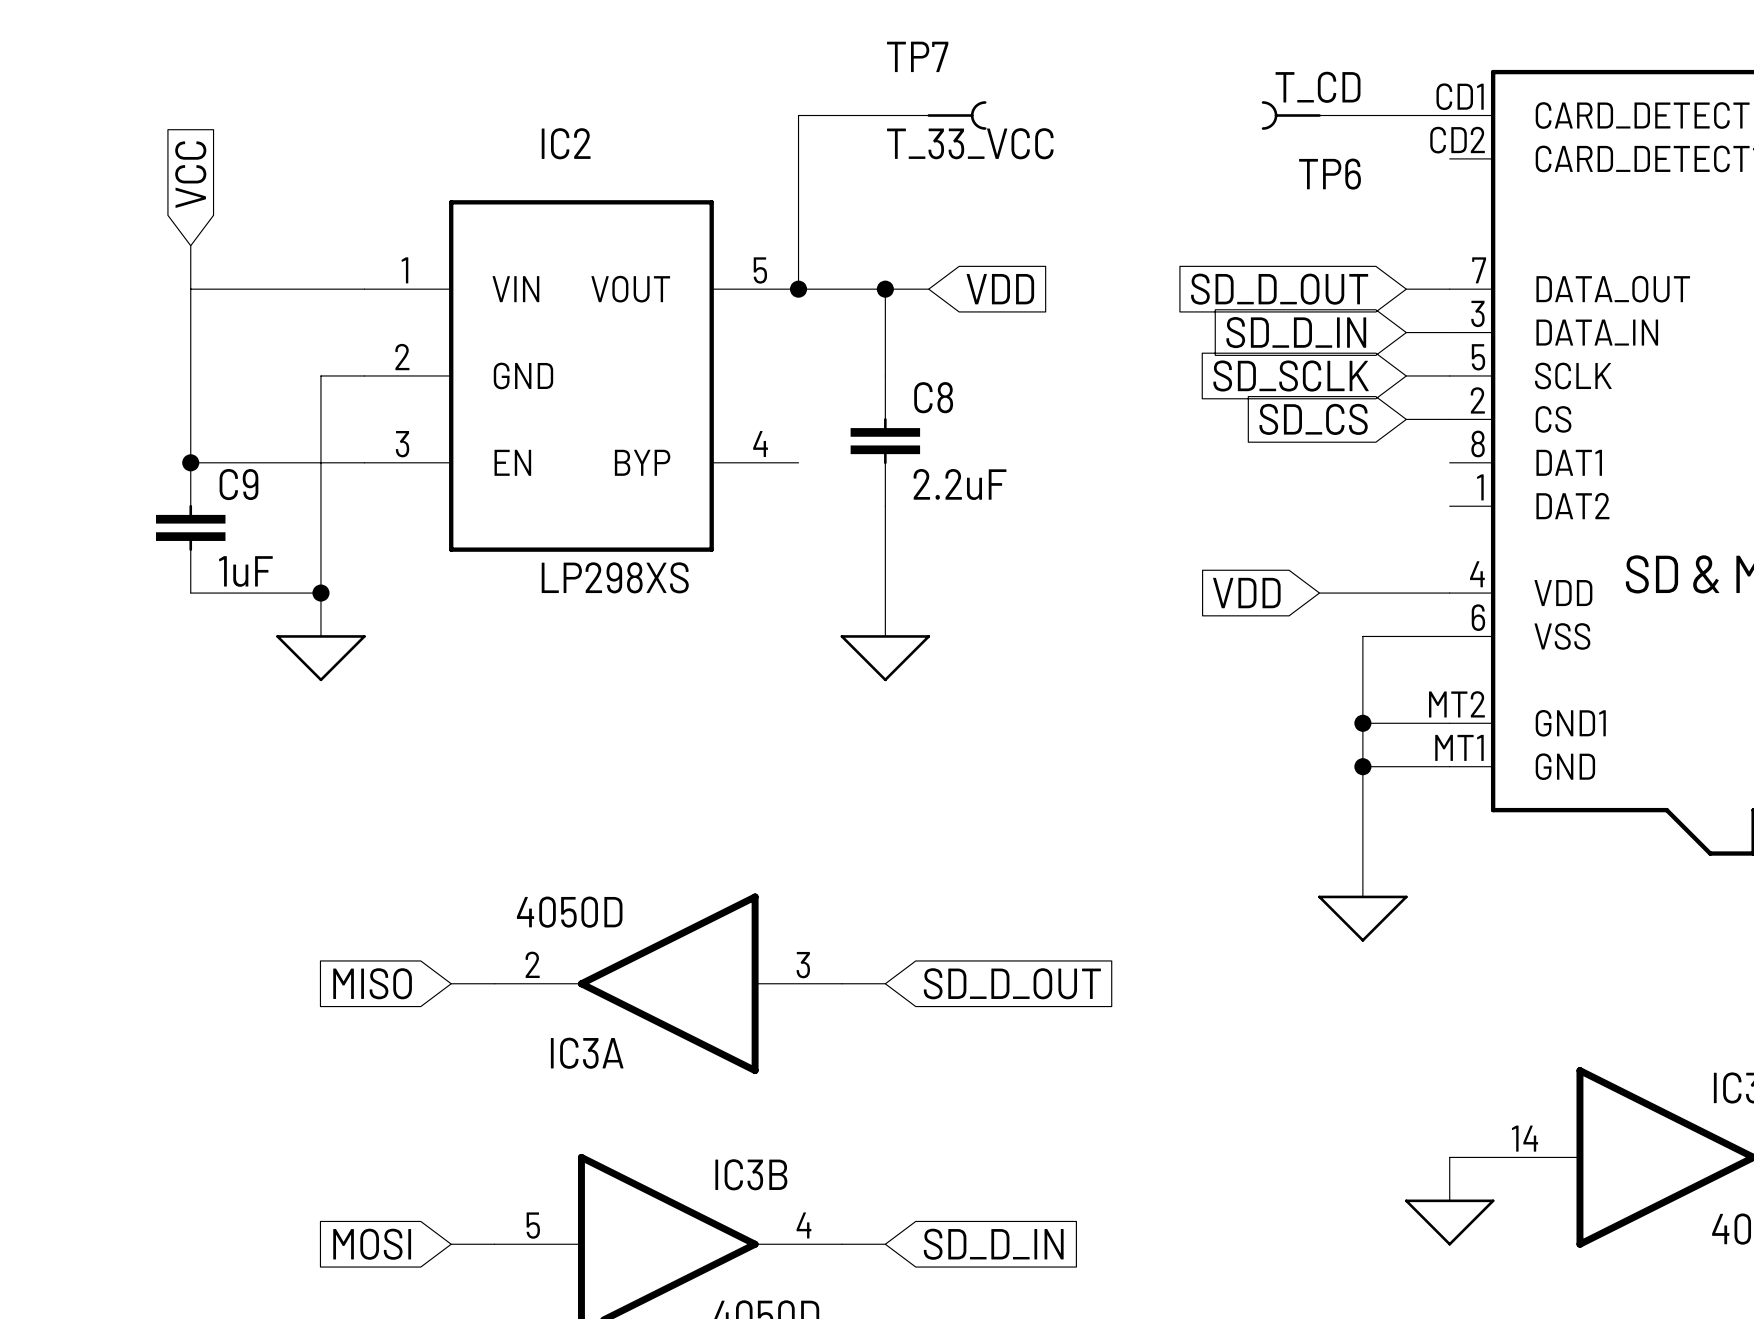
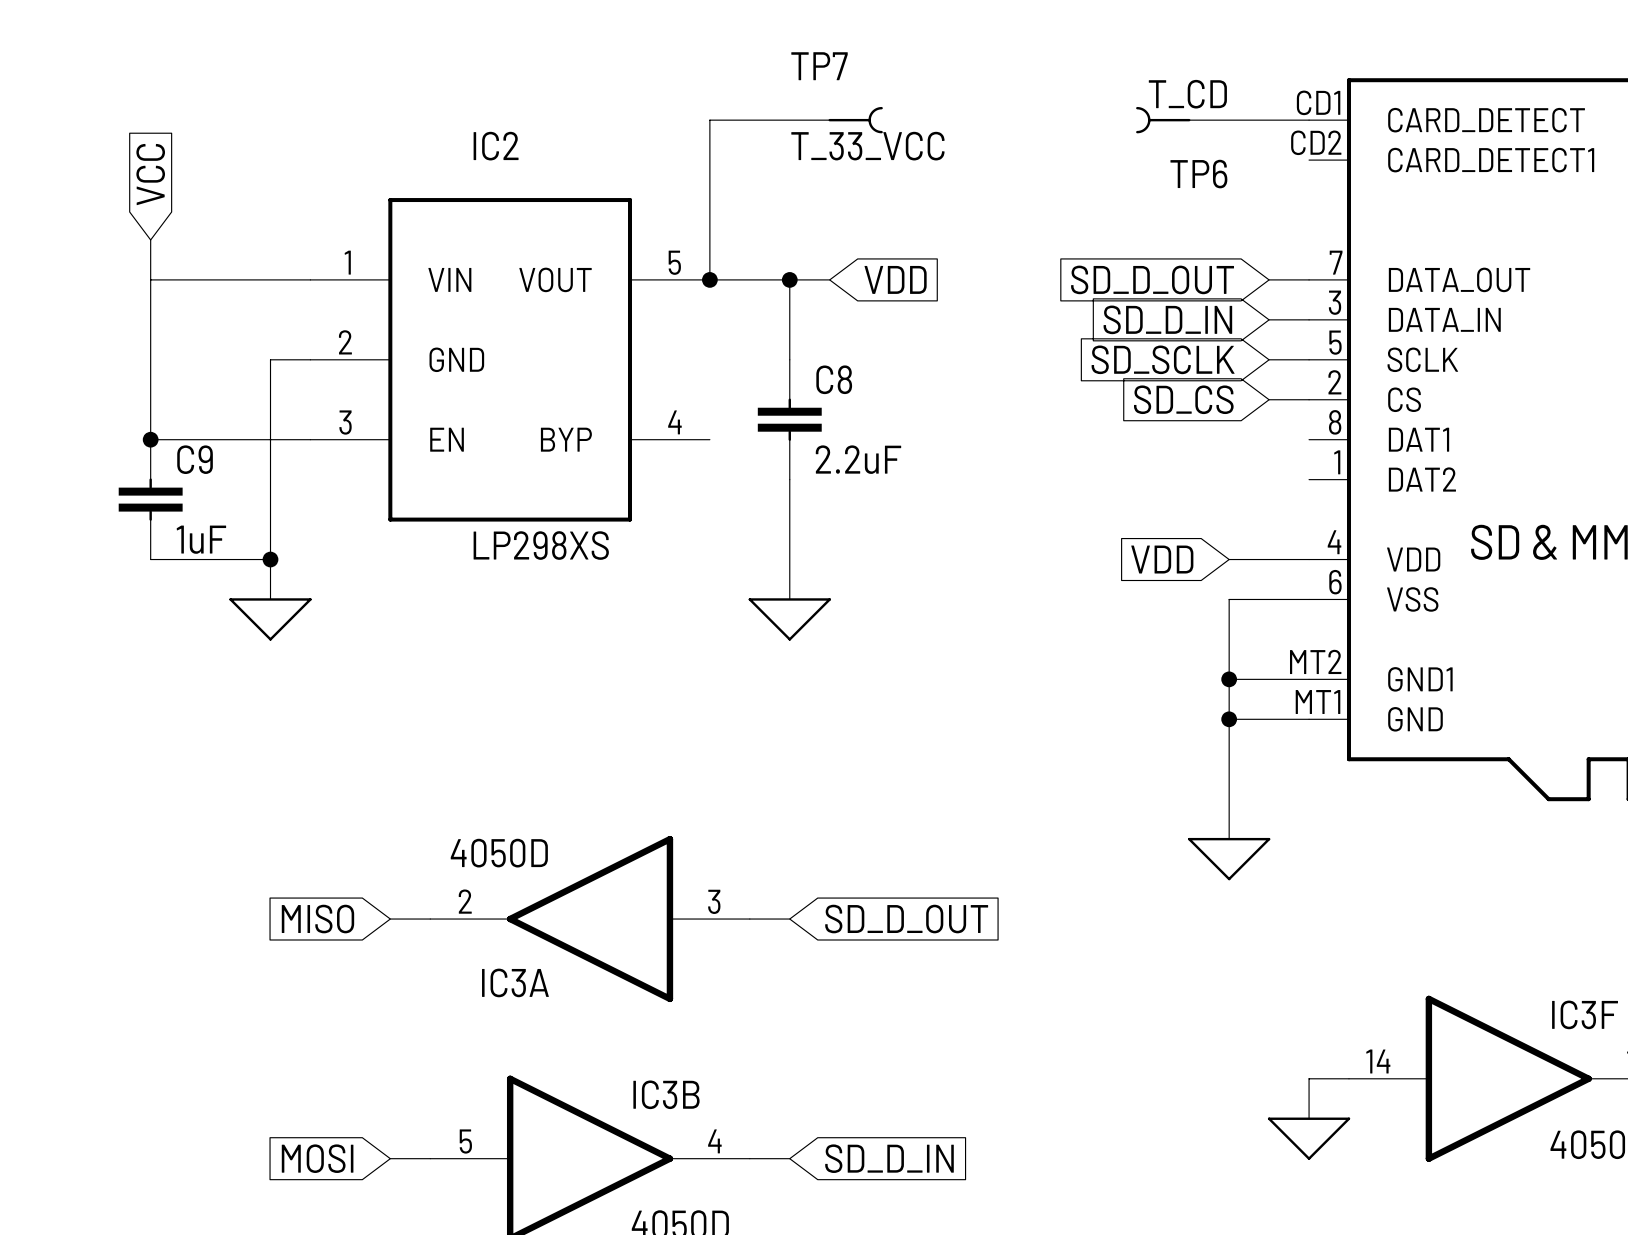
global label position: VDD (1246, 593) -> VDD (1162, 559)
wire: (1319, 593) (1362, 593) -> none

